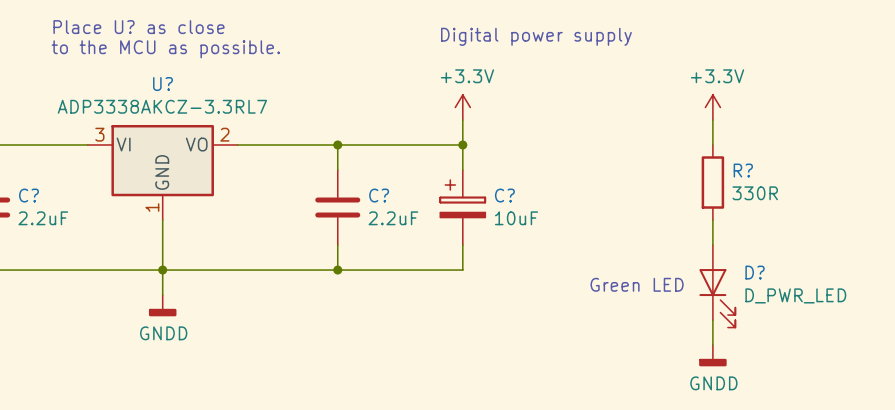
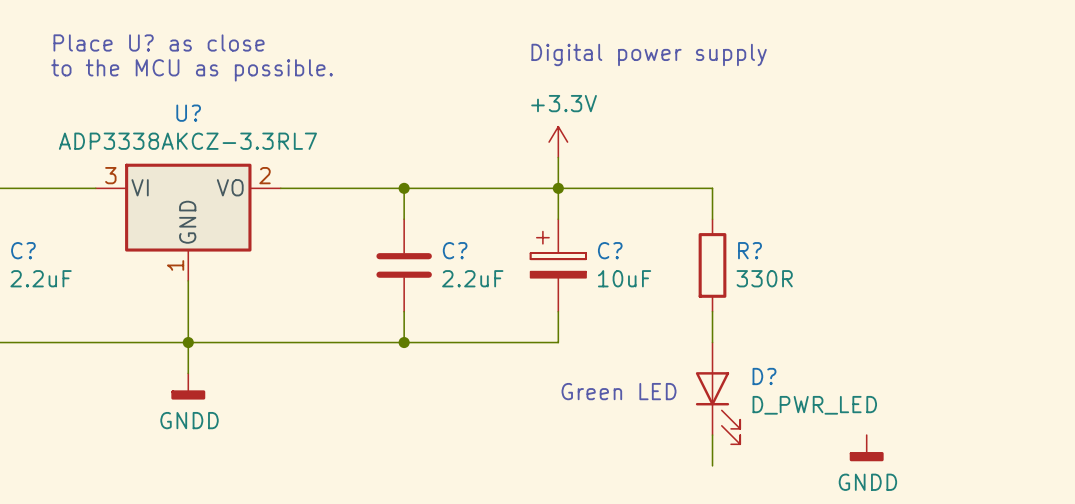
power symbol: +3.3V (712, 107) -> none
wire: (712, 119) (712, 144) -> none
wire: none -> (558, 188) (712, 188) (712, 219)
R? position: (712, 182) -> (712, 265)
wire: (712, 220) (712, 245) -> (712, 311) (712, 342)
text position: Green LED (637, 284) -> Green LED (619, 391)
D? position: (717, 286) -> (718, 393)
wire: (712, 320) (712, 345) -> (712, 435) (712, 465)

